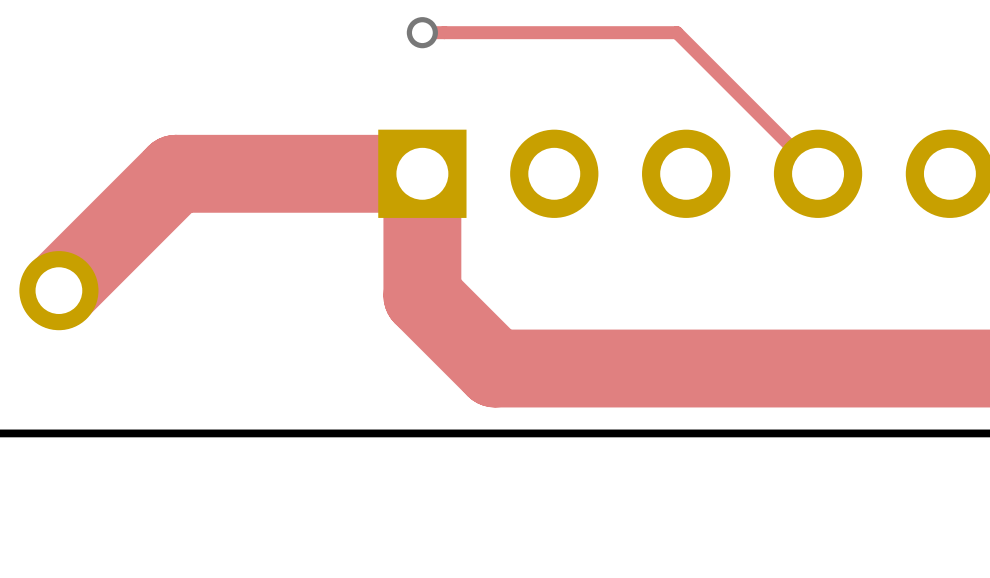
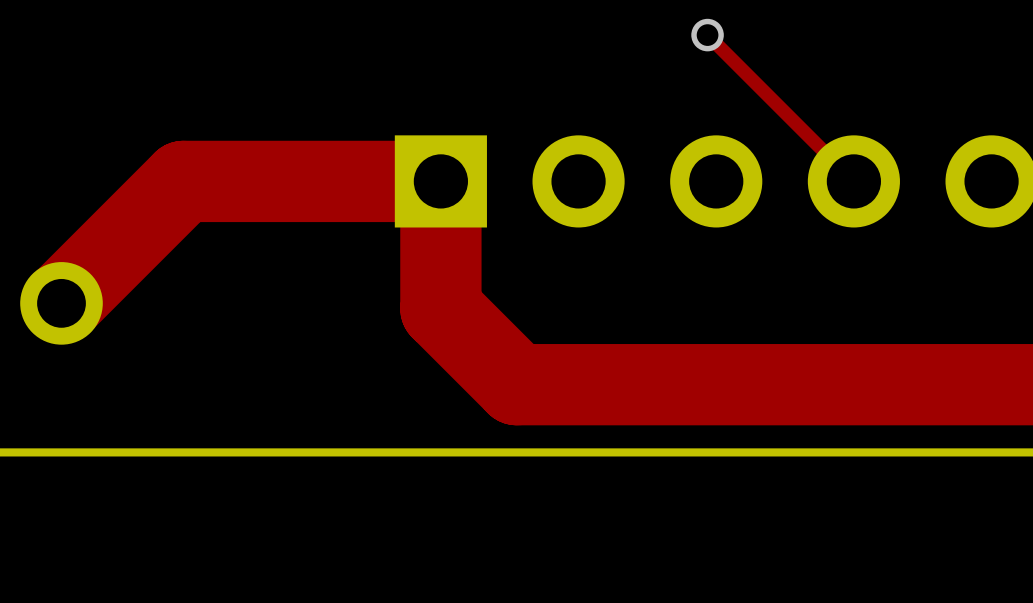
track: (422, 32) (677, 33) -> none
via position: (422, 32) -> (707, 35)

